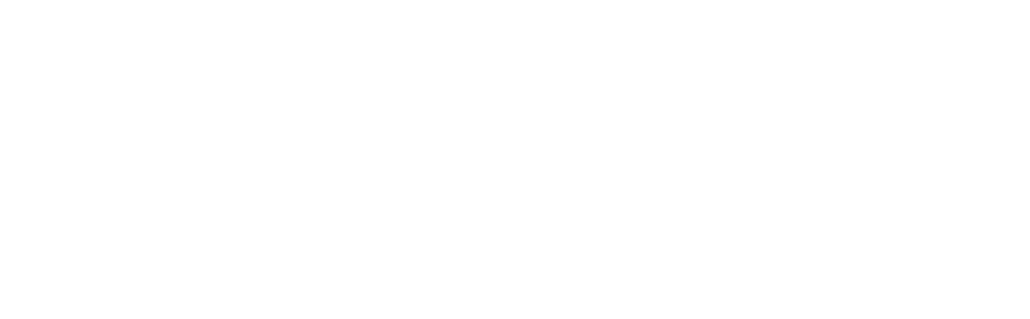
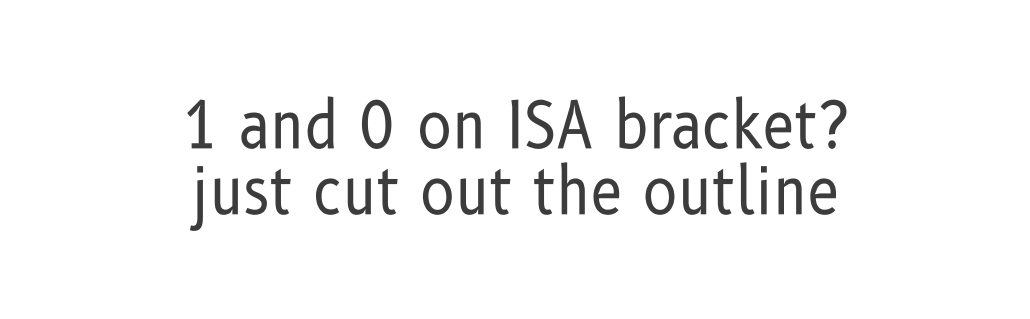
text: none -> 1 and 0 on ISA bracket? (516, 122)
text: none -> just cut out the outline (512, 196)

